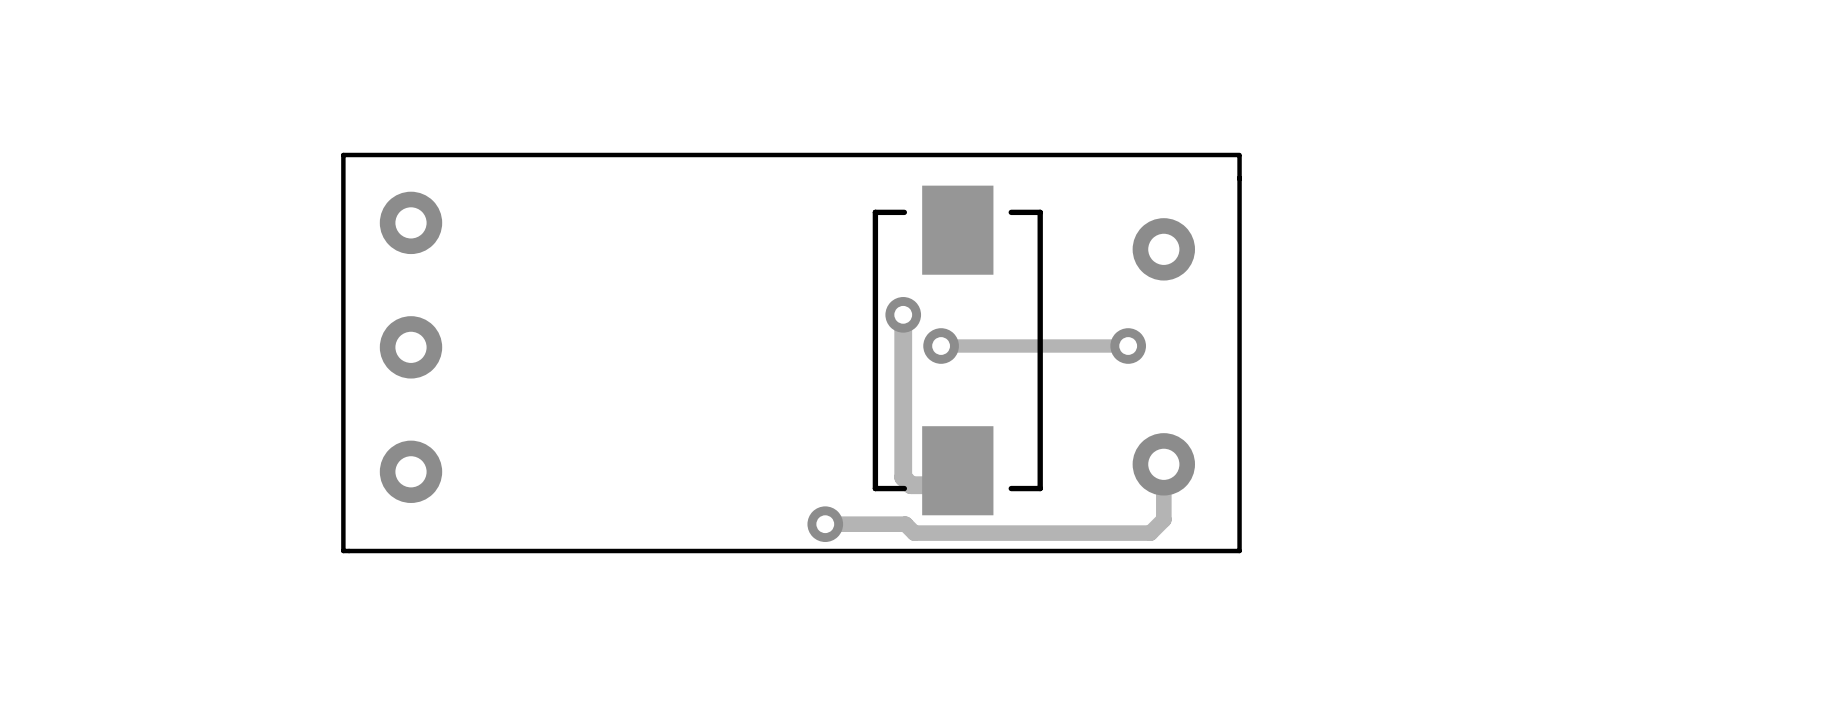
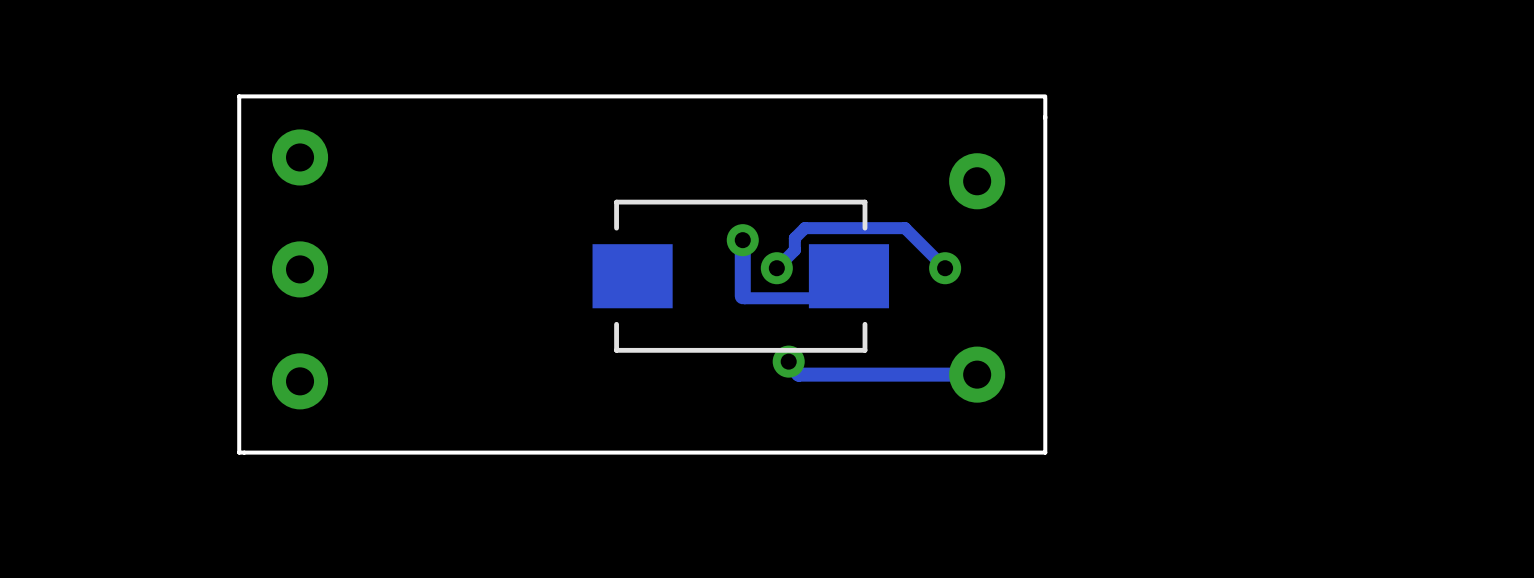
track: (1128, 346) (941, 346) -> (945, 268) (905, 228) (804, 228) (794, 238) (794, 250) (776, 268)
part rotation: 0° (957, 350) -> 90° clockwise (740, 276)
track: (903, 377) (903, 477) (911, 485) (952, 485) (957, 479) -> (742, 296) (744, 298) (826, 298) (848, 276)
track: (1163, 464) (1163, 519) (1150, 533) (914, 533) (905, 524) (825, 524) -> (977, 374) (798, 374) (792, 368) (792, 364)
via position: (825, 524) -> (788, 361)

